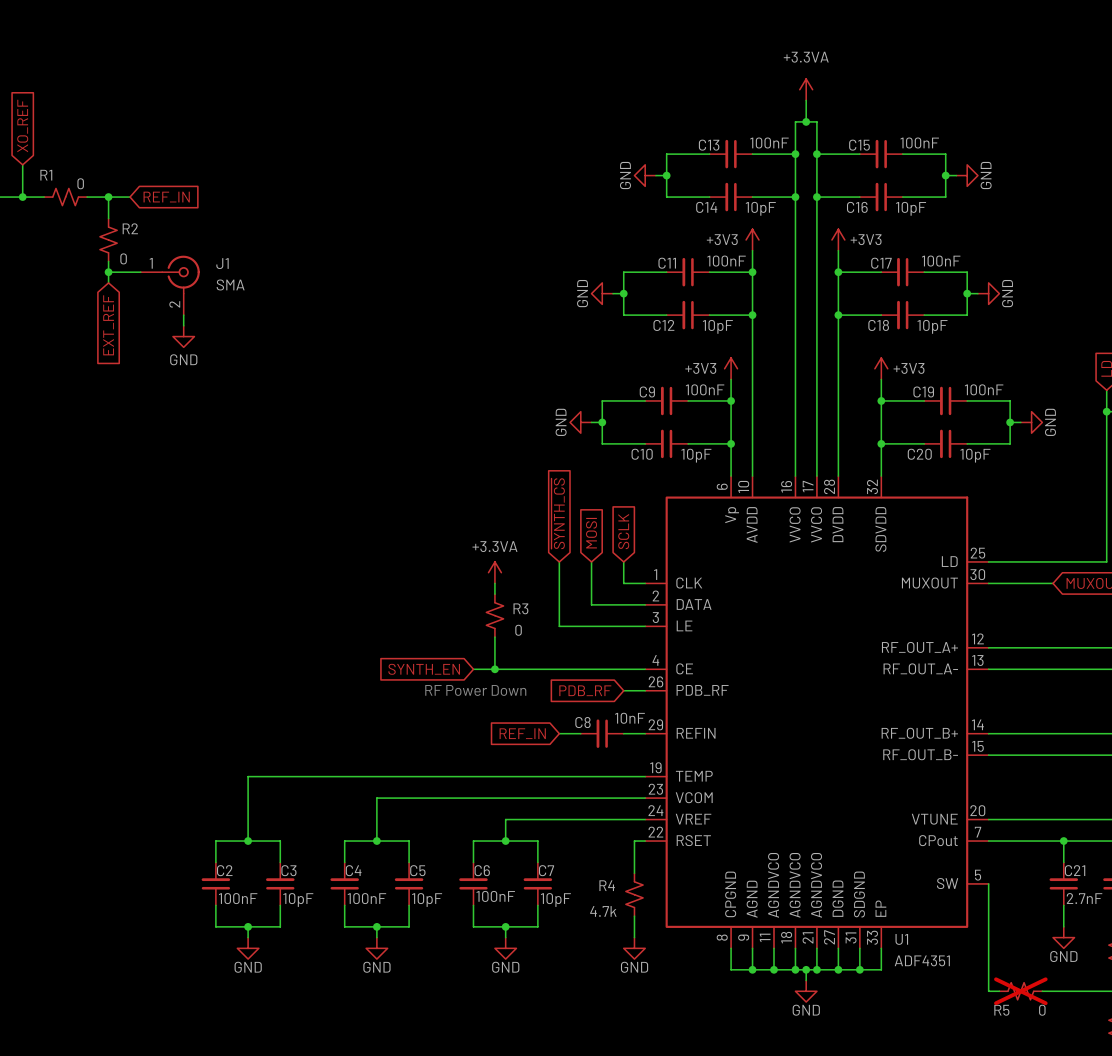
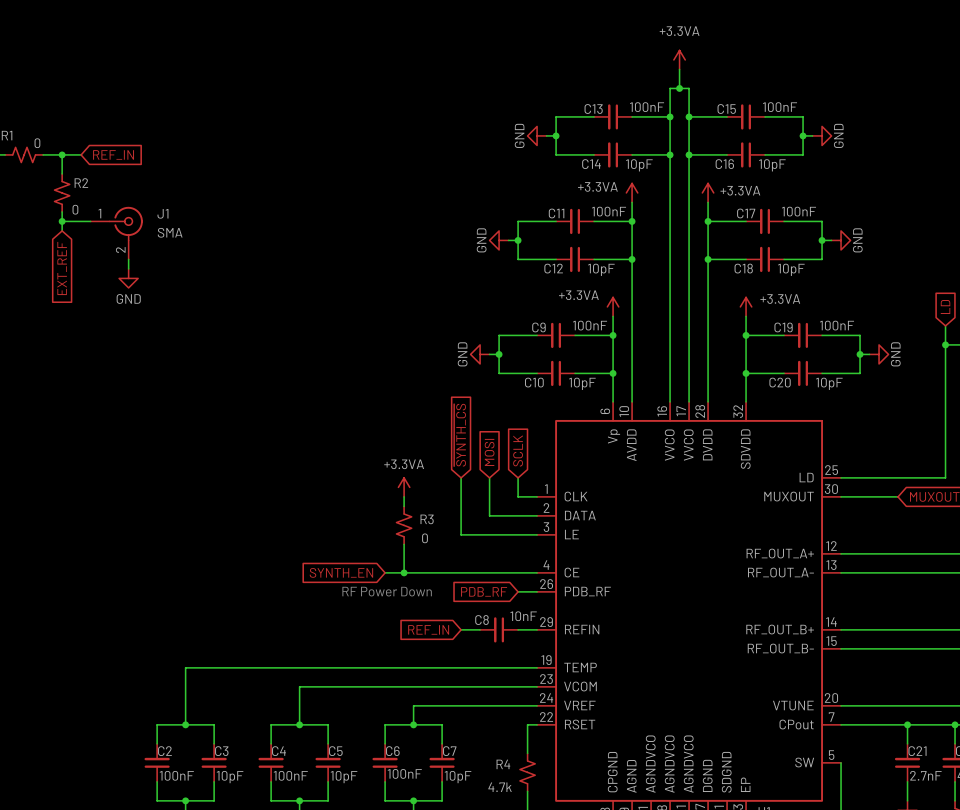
power symbol: +3V3 (752, 239) -> +3.3VA (632, 192)
power symbol: +3V3 (838, 239) -> +3.3VA (708, 192)
power symbol: +3V3 (731, 368) -> +3.3VA (613, 306)
power symbol: +3V3 (881, 368) -> +3.3VA (746, 306)

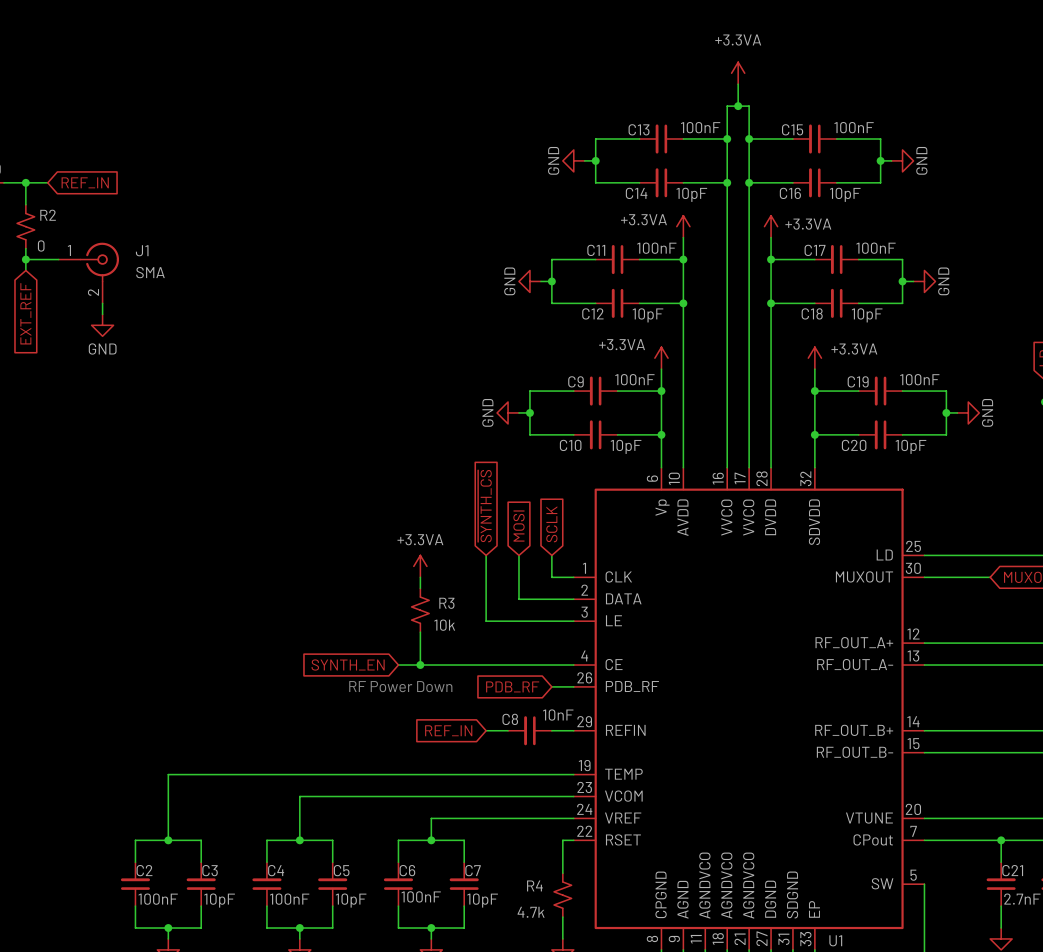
R3 value: 0 (424, 538) -> 10k (444, 625)

